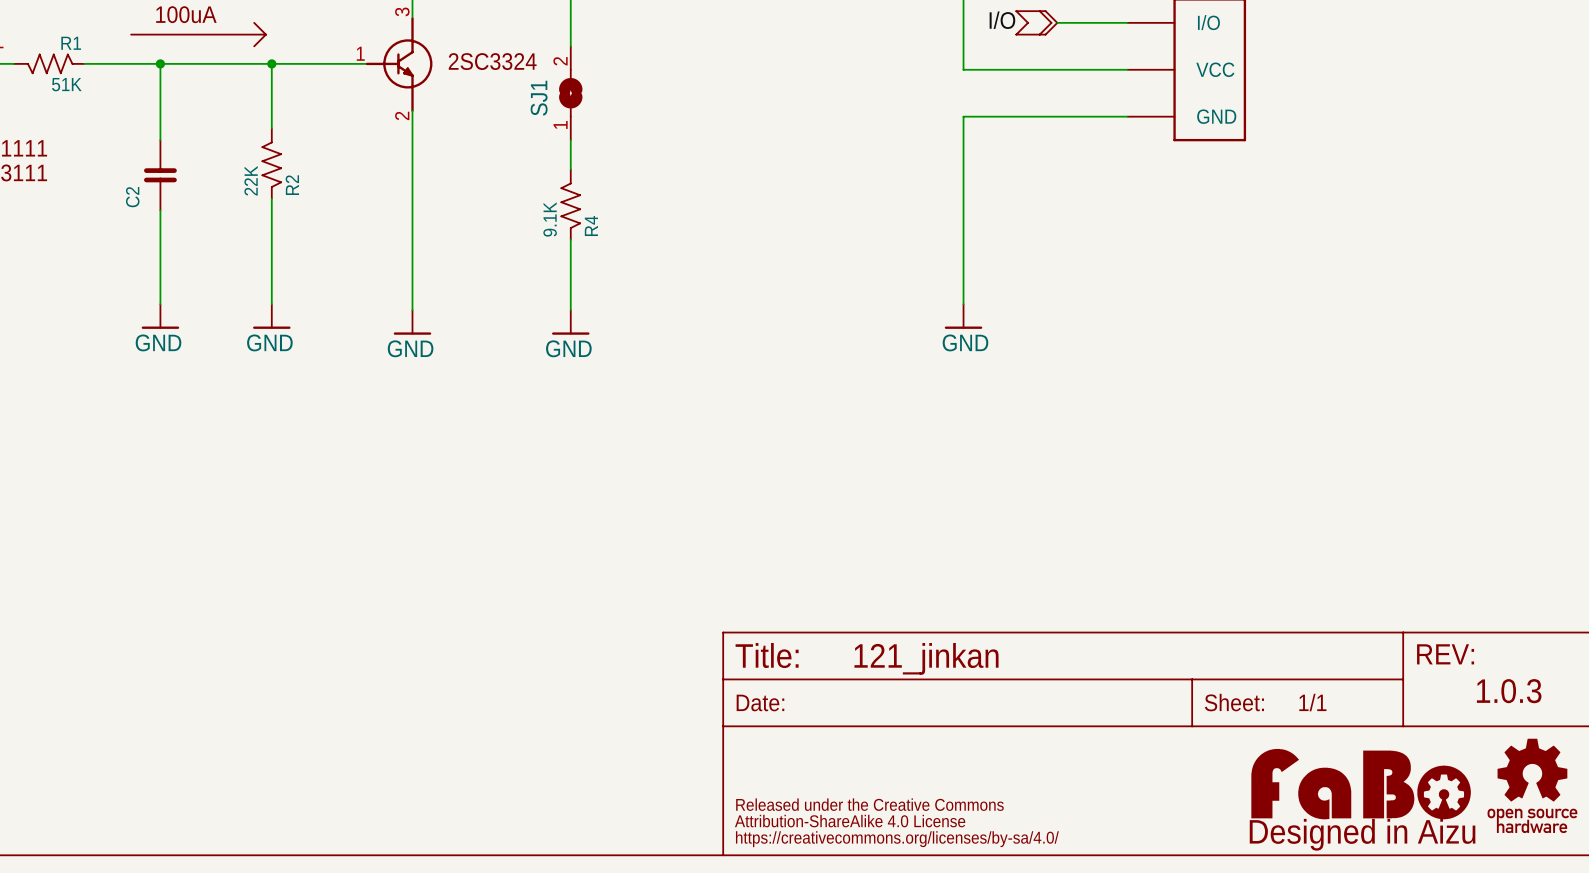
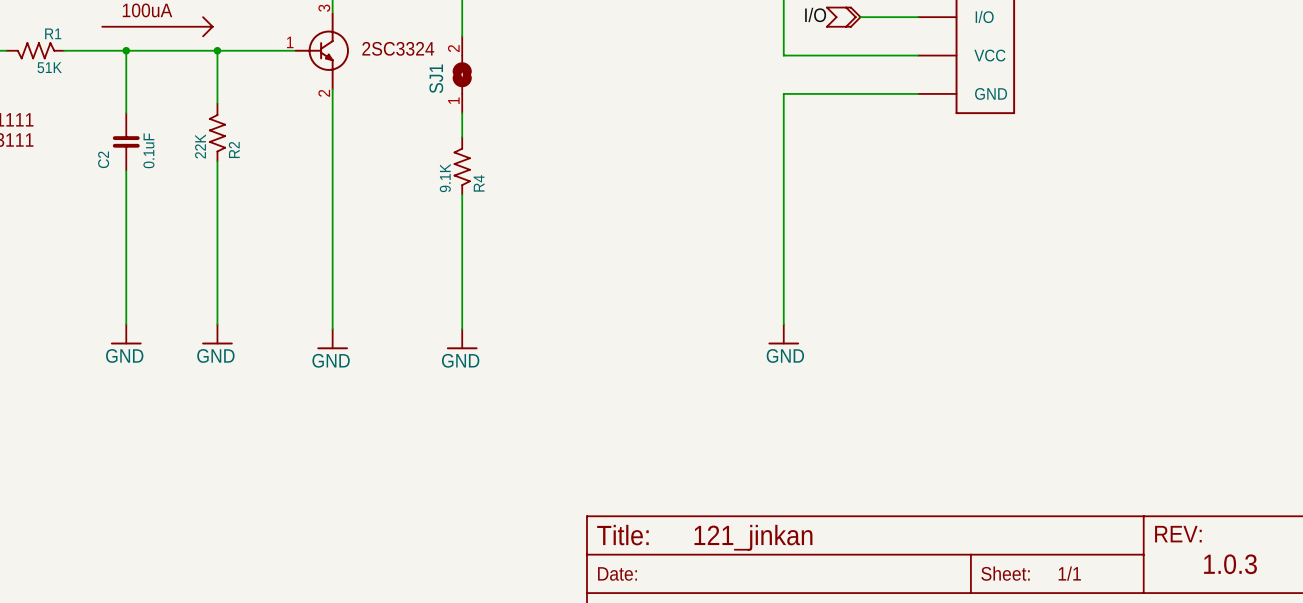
C2 value: none -> 0.1uF (148, 150)
wire: none -> (126, 247) (126, 324)
wire: none -> (217, 247) (217, 324)
wire: none -> (783, 247) (783, 324)
wire: none -> (332, 252) (332, 329)
wire: none -> (462, 252) (462, 329)
power symbol: GND (160, 316) -> none
power symbol: GND (271, 316) -> none
power symbol position: GND (963, 316) -> GND (783, 334)
power symbol: GND (412, 322) -> none
power symbol: GND (570, 322) -> none
power symbol: none -> GND (126, 334)
power symbol: none -> GND (217, 334)
power symbol: none -> GND (332, 339)
power symbol: none -> GND (462, 339)

